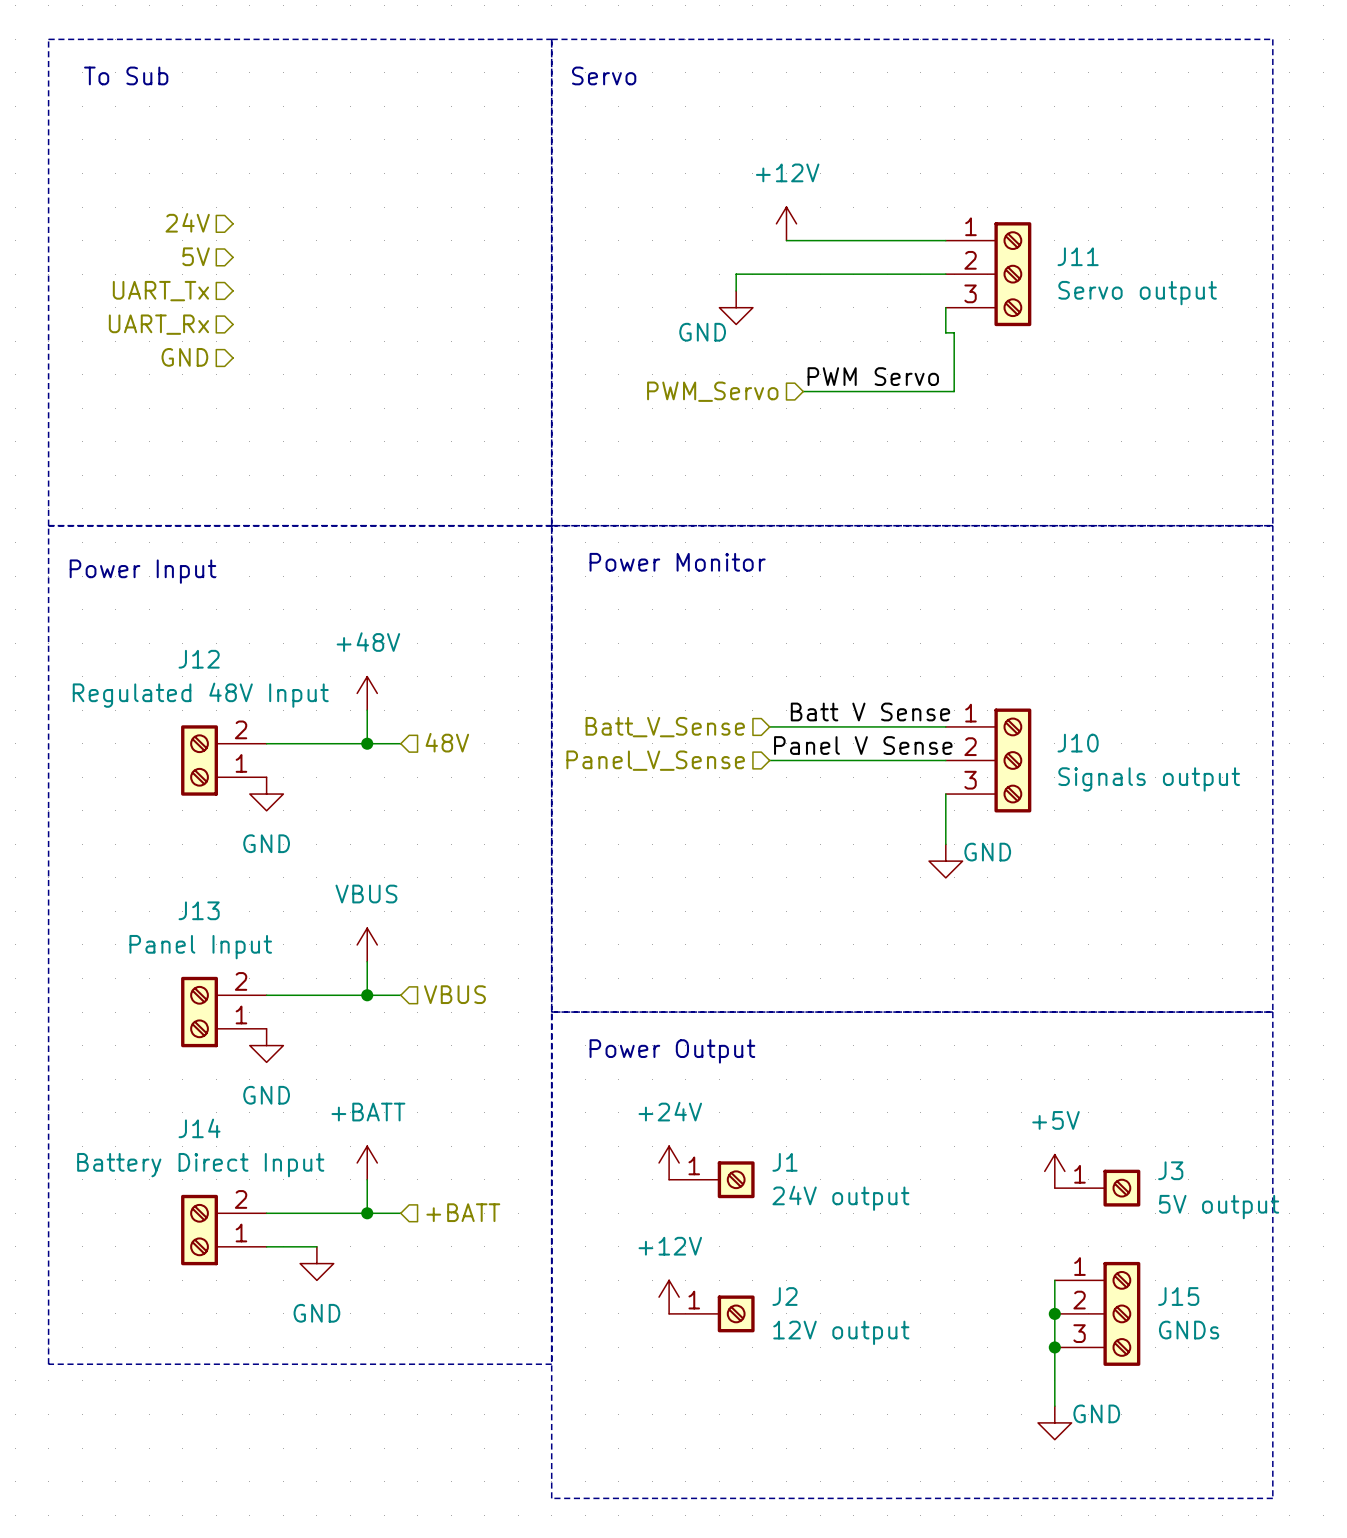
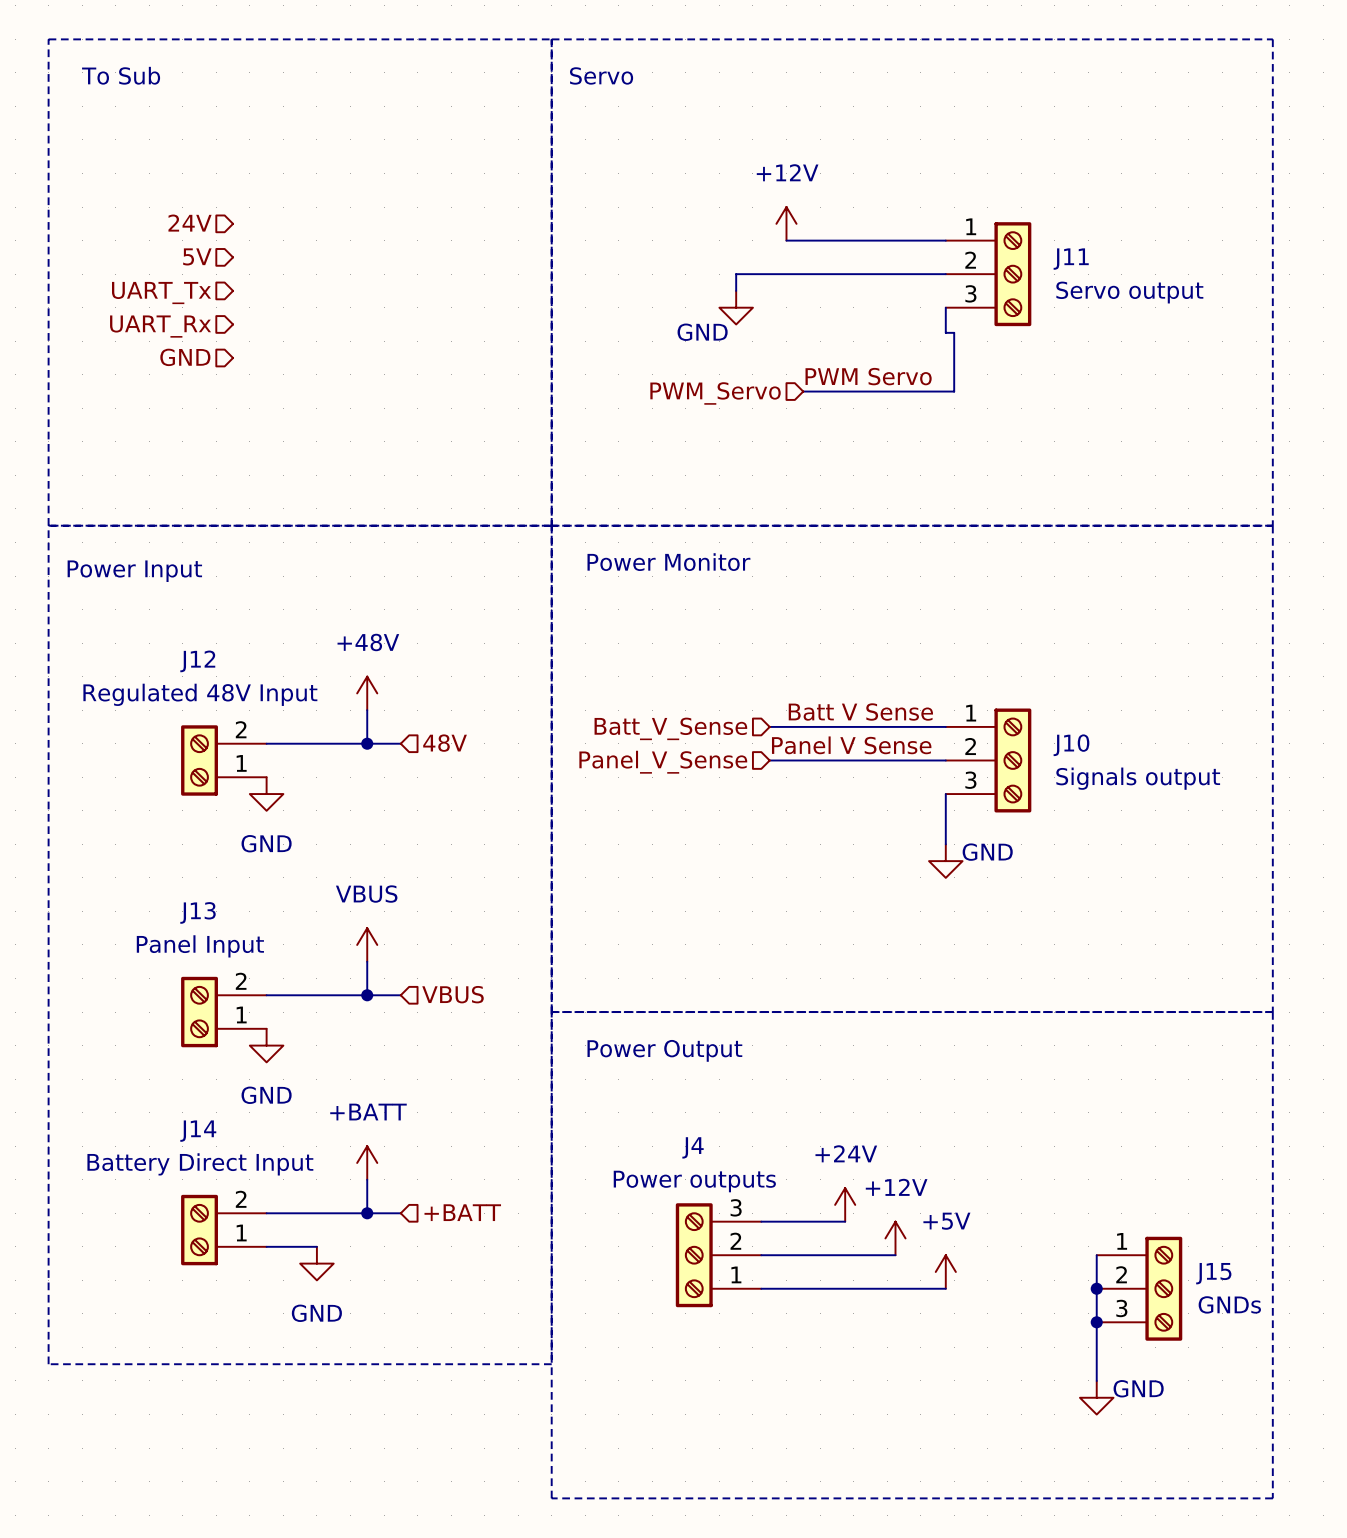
power symbol position: +24V (669, 1162) -> +24V (845, 1204)
power symbol position: +5V (1054, 1171) -> +5V (945, 1271)
J1: 24V output (711, 1179) -> none
J3: 5V output (1097, 1188) -> none
wire: none -> (761, 1221) (845, 1221)
J4: none -> Power outputs (718, 1255)
wire: none -> (761, 1255) (895, 1255)
wire: (1054, 1280) (1054, 1406) -> (1096, 1255) (1096, 1380)
wire: none -> (761, 1288) (945, 1288)
junction: none -> (1096, 1288)
power symbol position: +12V (669, 1297) -> +12V (895, 1238)
J2: 12V output (711, 1313) -> none
junction: (1054, 1313) -> none
J15 position: (1097, 1313) -> (1139, 1288)
junction: none -> (1096, 1322)
junction: (1054, 1347) -> none
power symbol position: GND (1054, 1422) -> GND (1096, 1397)

